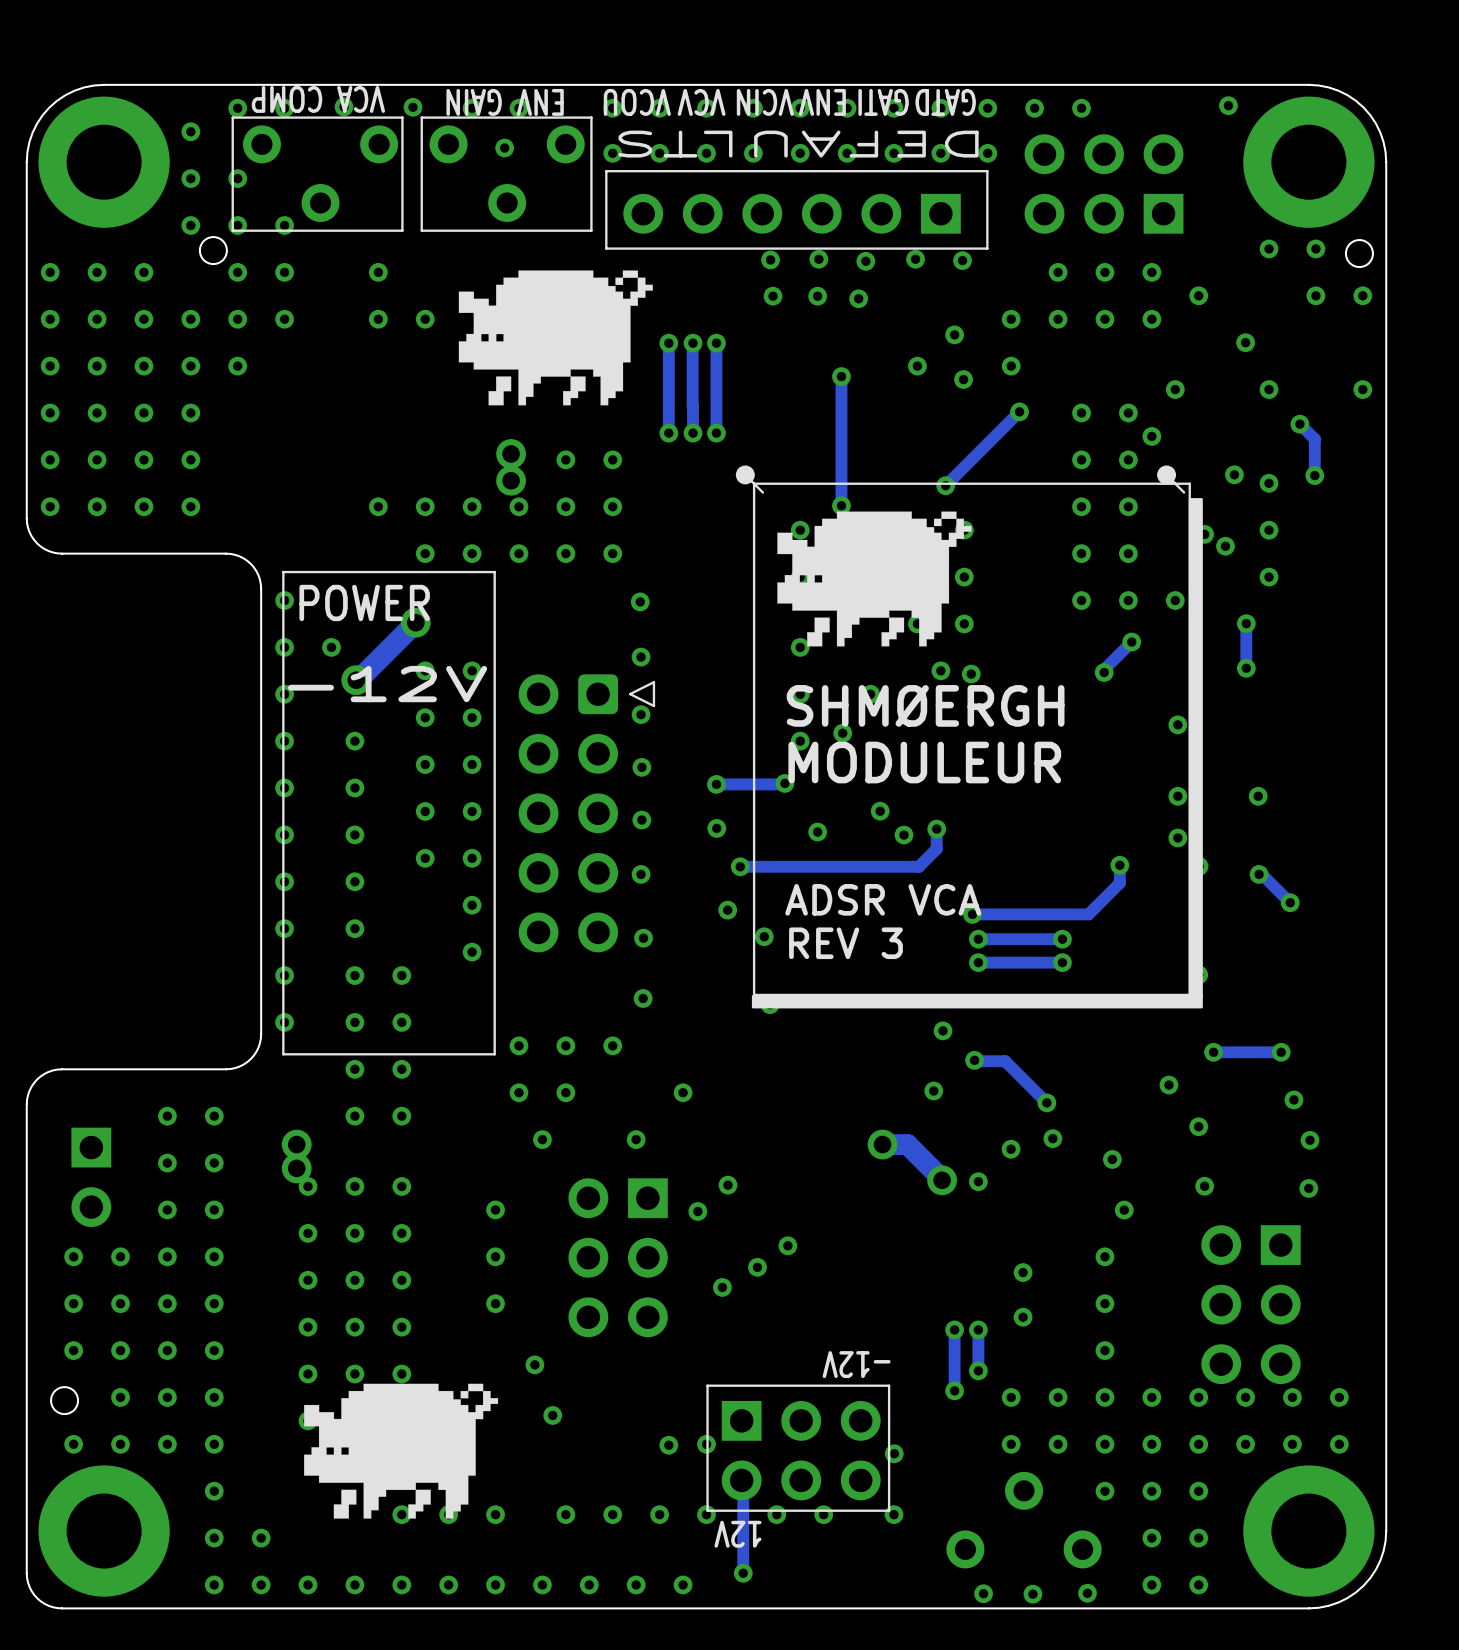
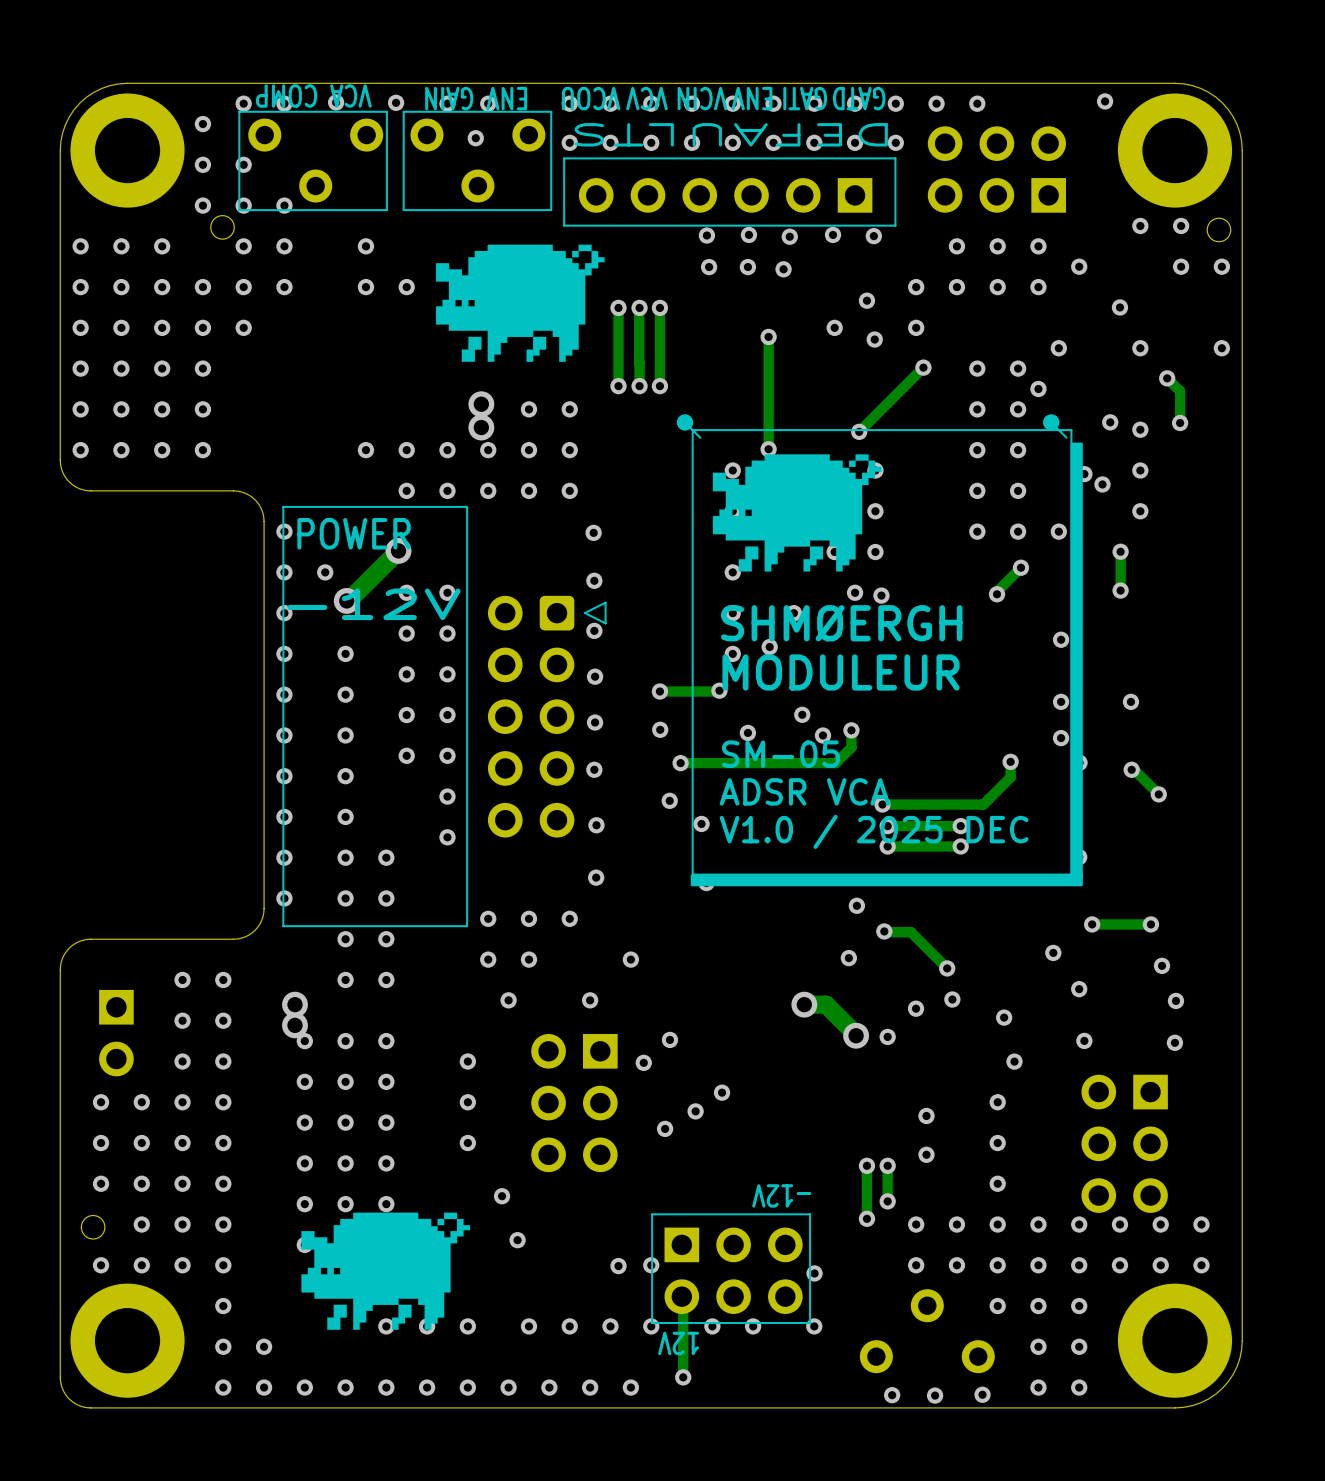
text: none -> SM-05 (780, 754)
text: REV 3 (846, 943) -> V1.0 / 2025 DEC (874, 831)

